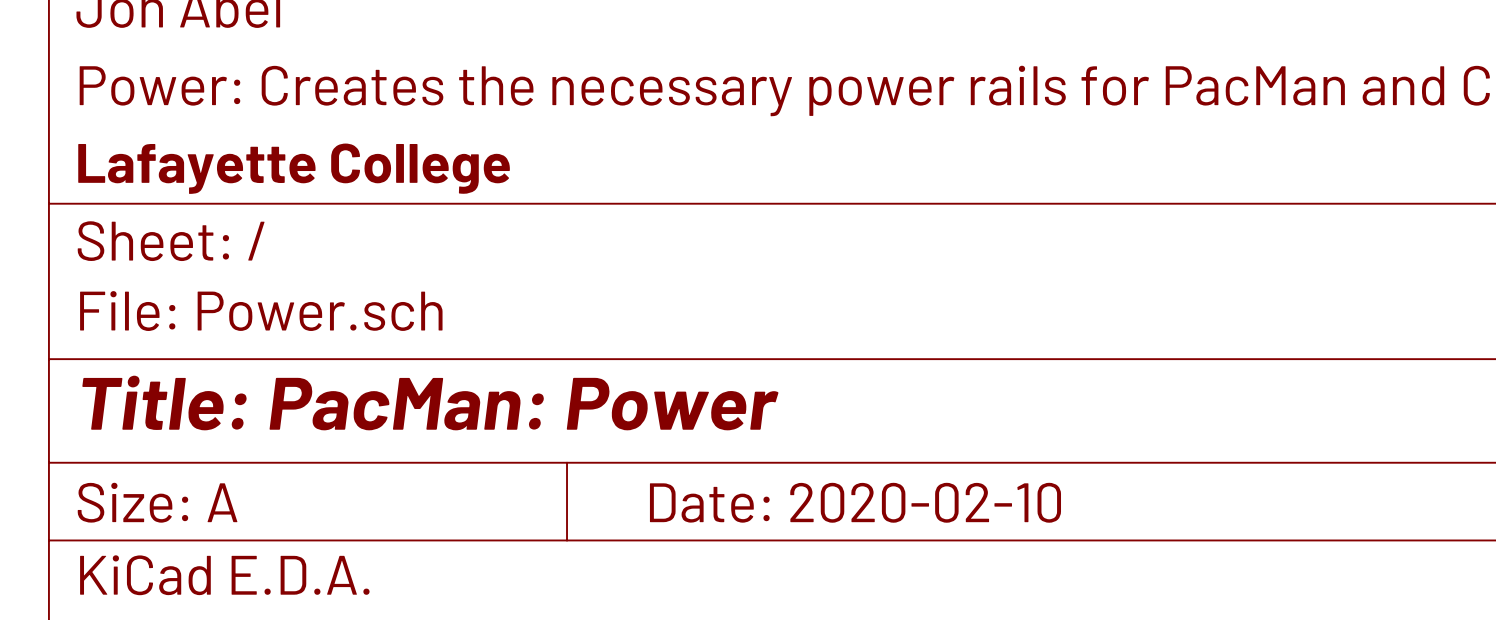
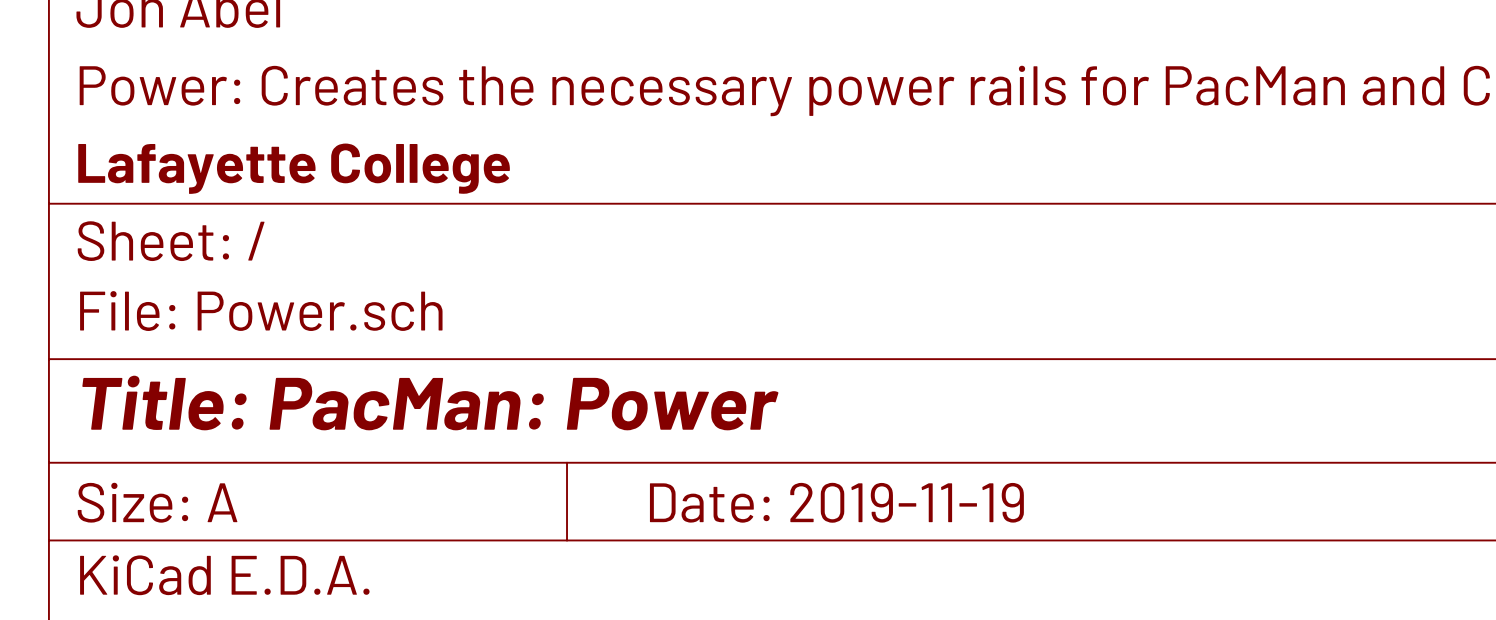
title block: Date: 2020-02-10 (855, 502) -> Date: 2019-11-19 (836, 502)

